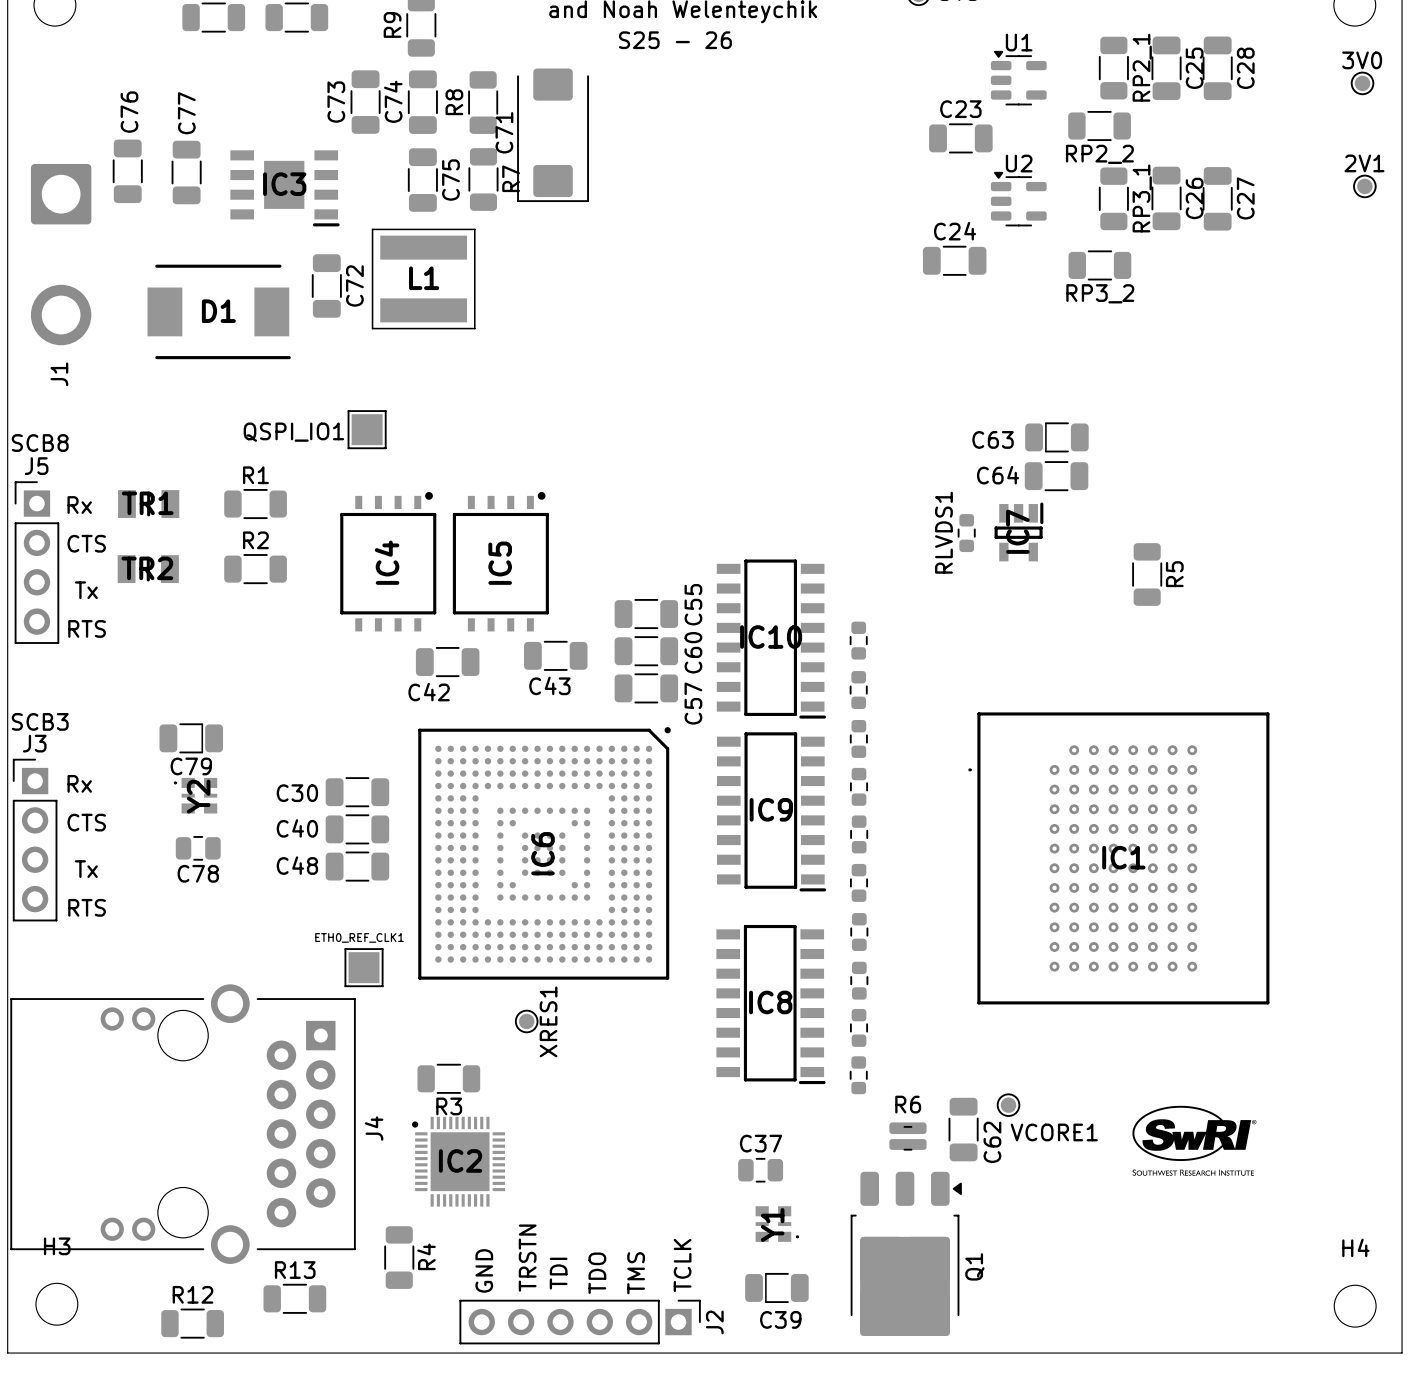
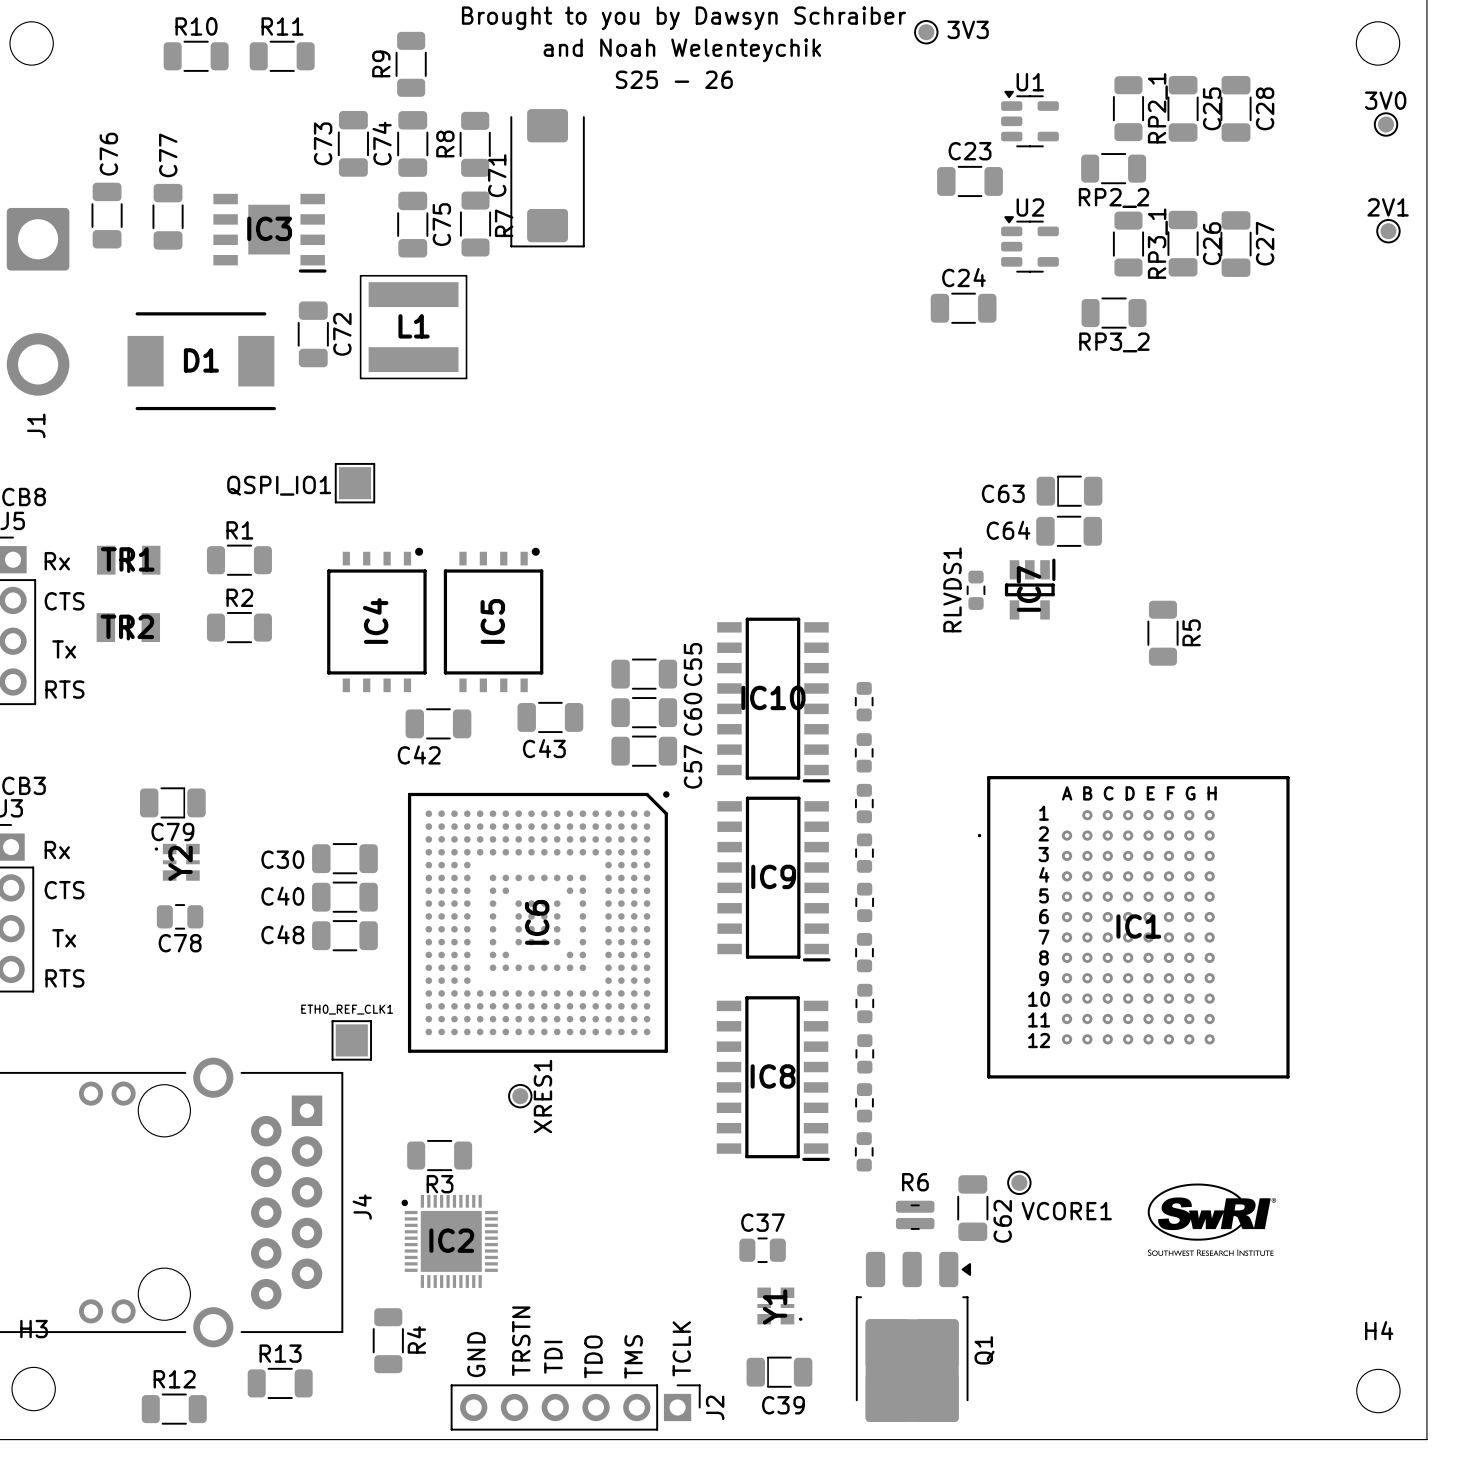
text: none -> A B C D E F G H (1139, 793)
text: none -> 1 (1043, 813)
text: none -> 2 (1043, 833)
text: none -> 3 (1043, 854)
text: none -> 4 (1044, 874)
text: none -> 5 (1043, 895)
text: none -> 6 (1043, 916)
text: none -> 7 (1043, 937)
text: none -> 8 (1043, 957)
text: none -> 9 (1043, 978)
text: none -> 10 (1039, 999)
text: none -> 11 (1039, 1019)
text: none -> 12 (1039, 1040)

